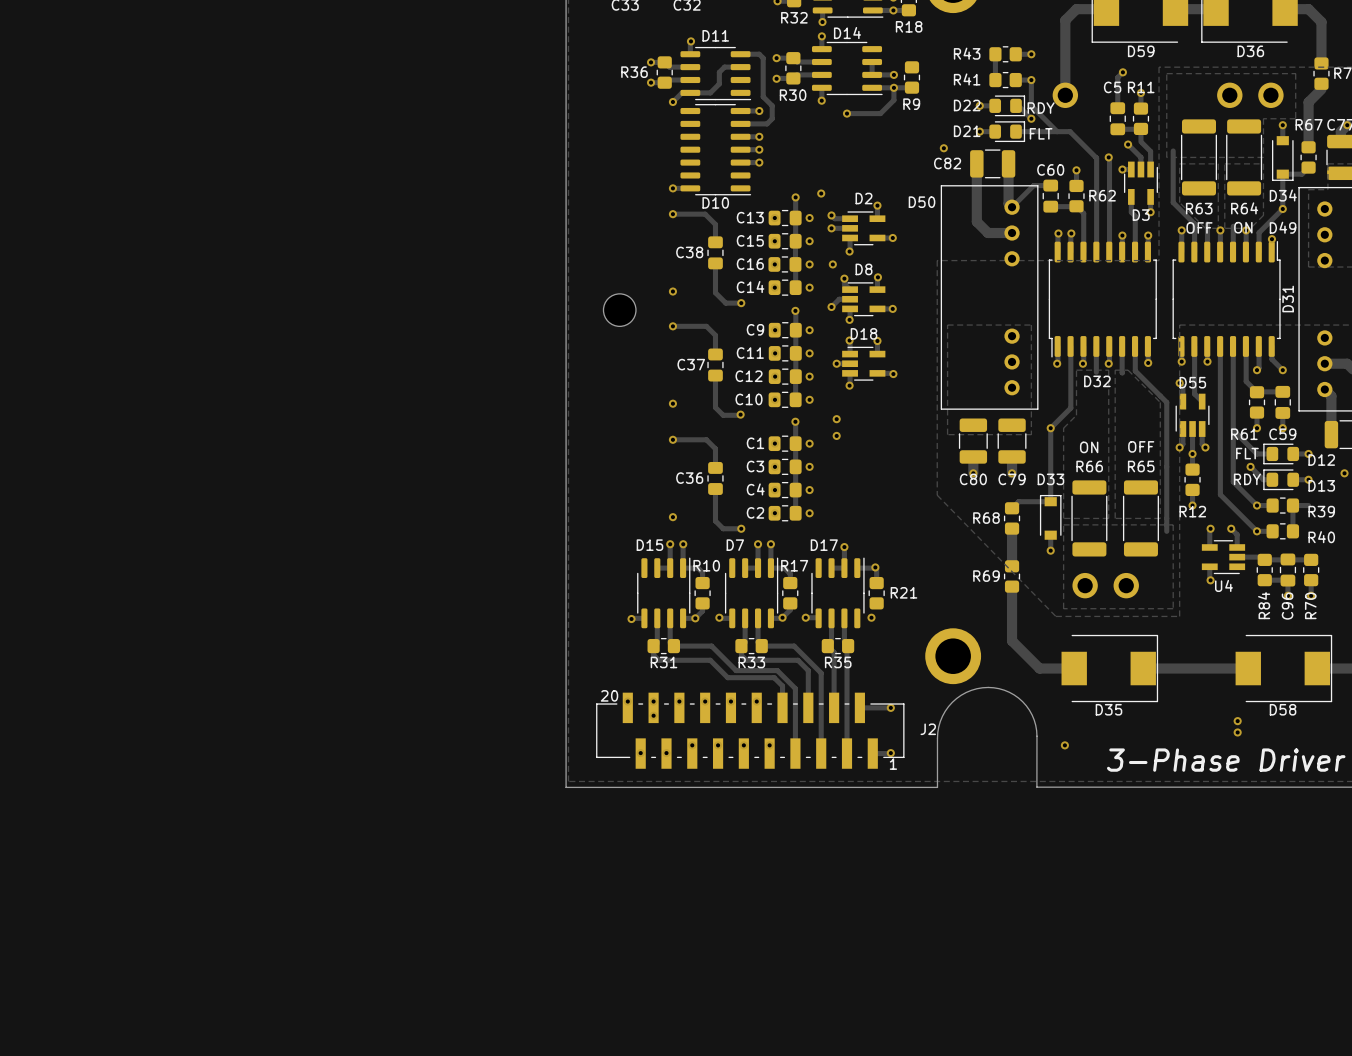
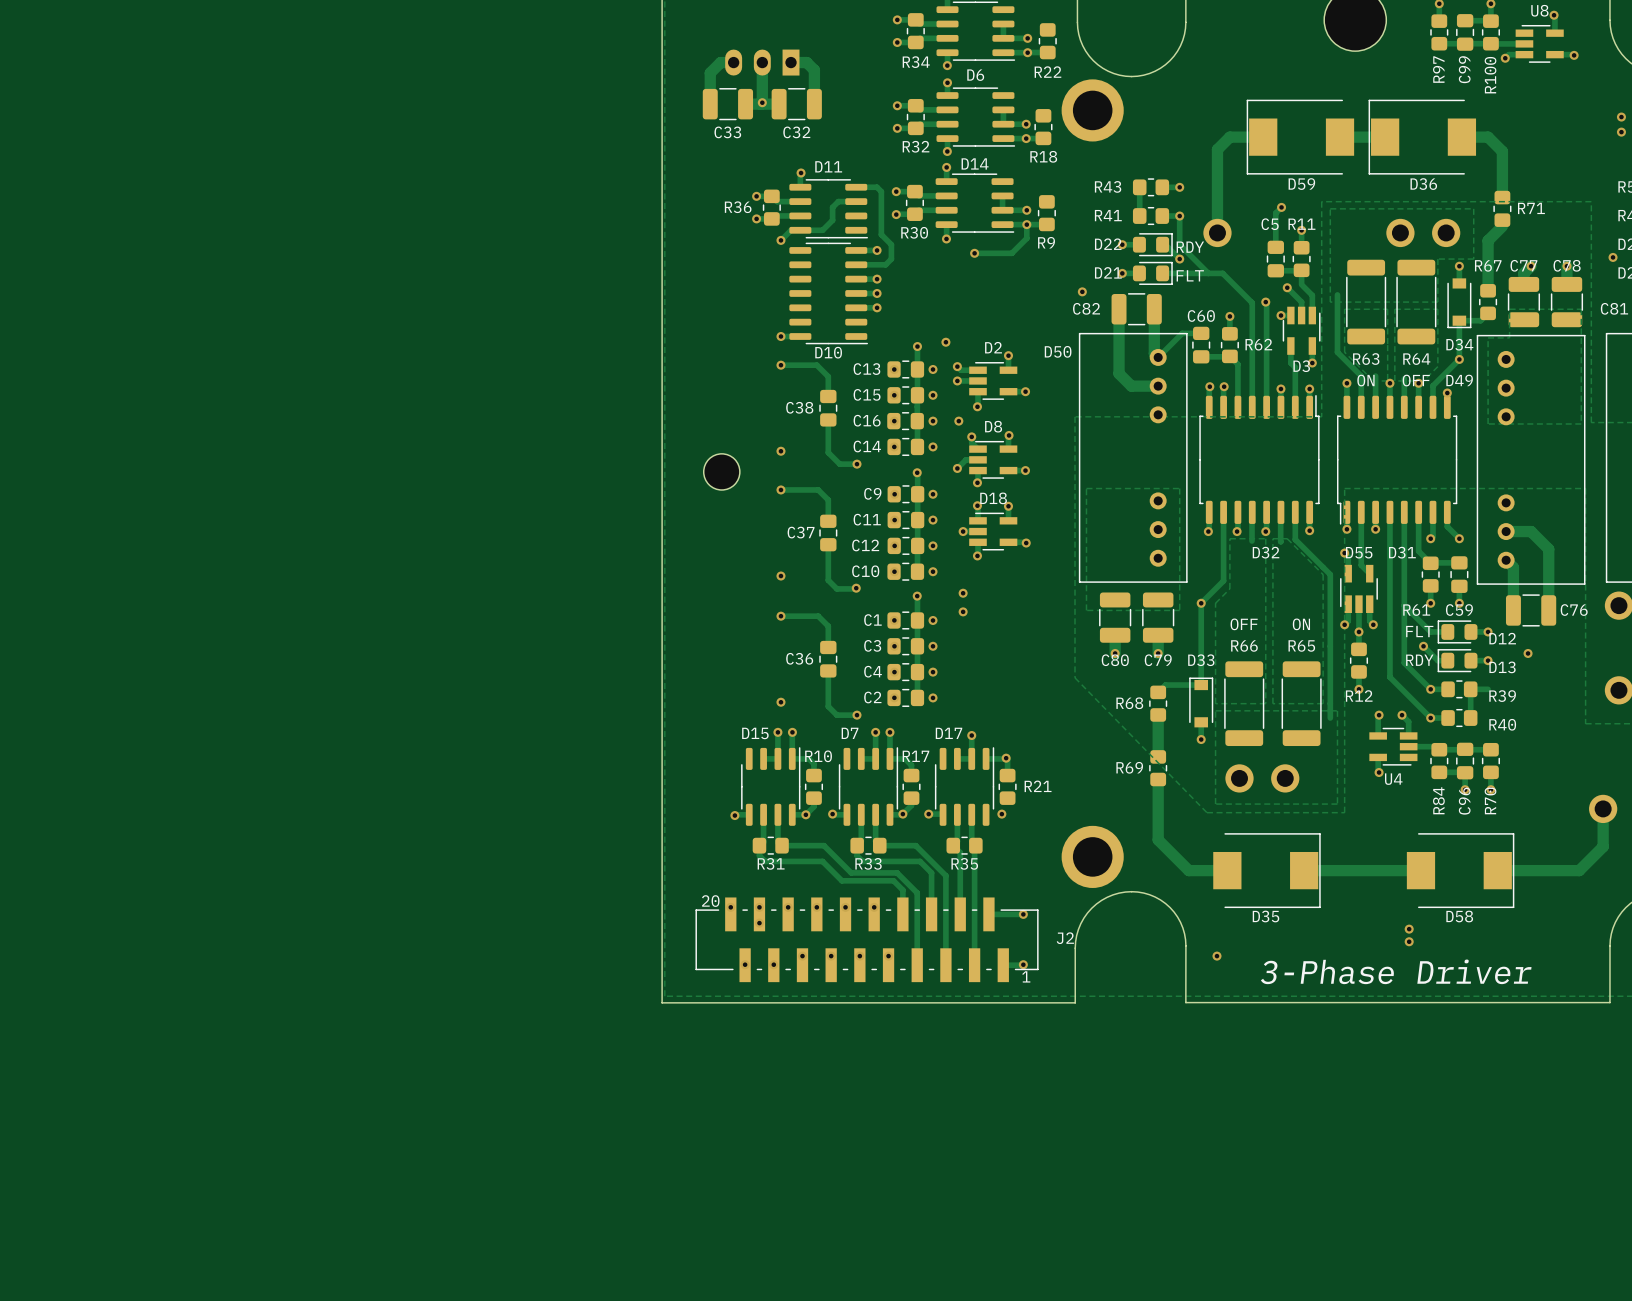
text: OFF (1199, 227) -> ON (1365, 380)
text: ON (1243, 227) -> OFF (1416, 380)
D31 rotation: 0° (1226, 298) -> 180° (1397, 460)
D32 rotation: 0° (1102, 299) -> 180° (1259, 459)
D31 name position: D31 (1288, 299) -> D31 (1402, 552)
text: OFF (1141, 446) -> ON (1301, 624)
text: ON (1089, 447) -> OFF (1244, 624)

